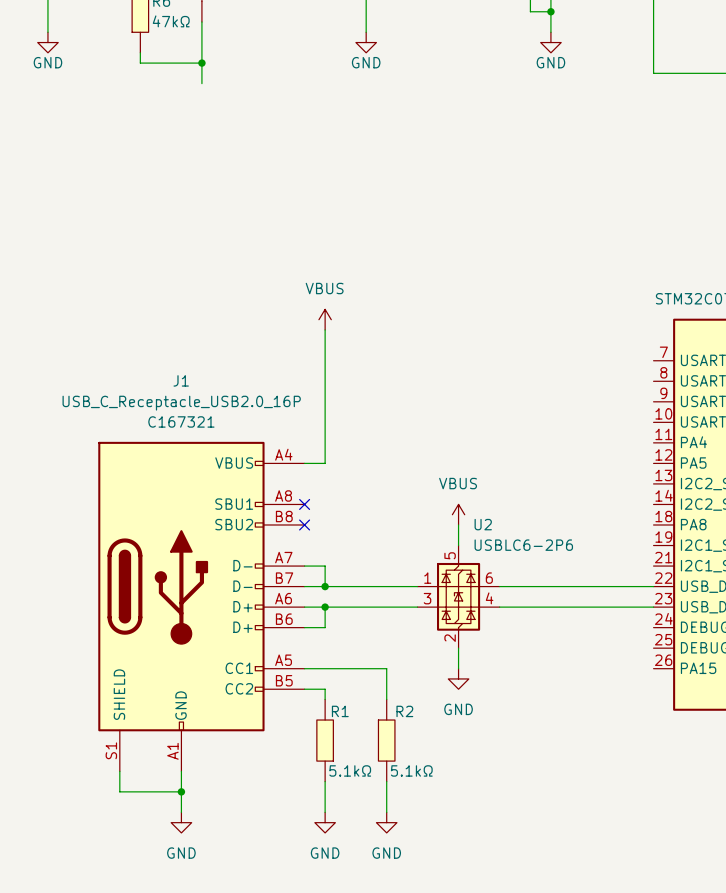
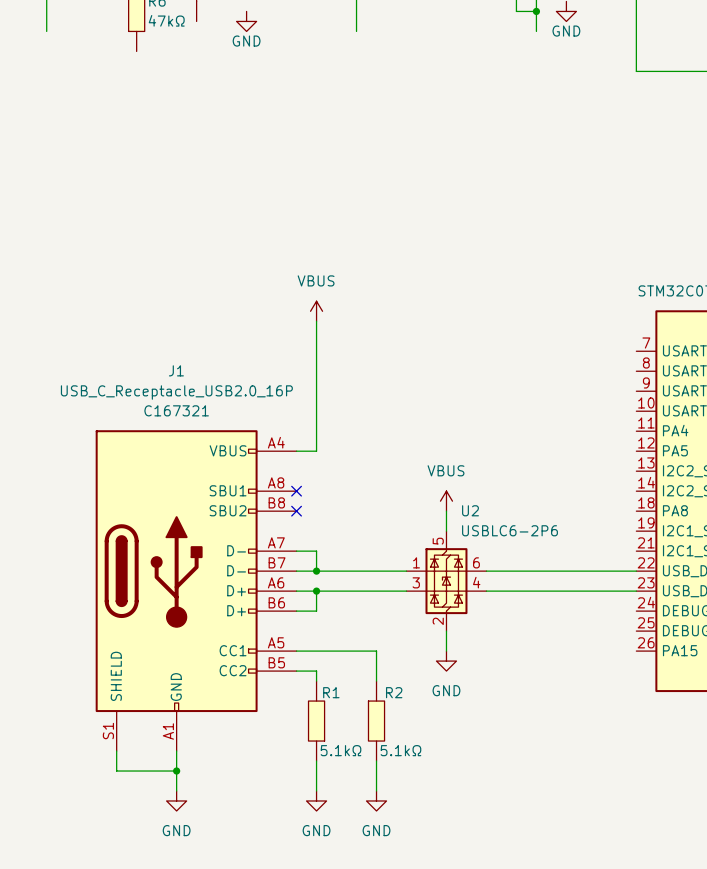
wire: (201, 22) (201, 83) -> none
power symbol: none -> GND (246, 21)
power symbol: GND (47, 42) -> none
power symbol: GND (366, 42) -> none
power symbol position: GND (550, 42) -> GND (566, 11)
wire: (140, 52) (140, 63) (201, 63) -> none
junction: (201, 63) -> none

